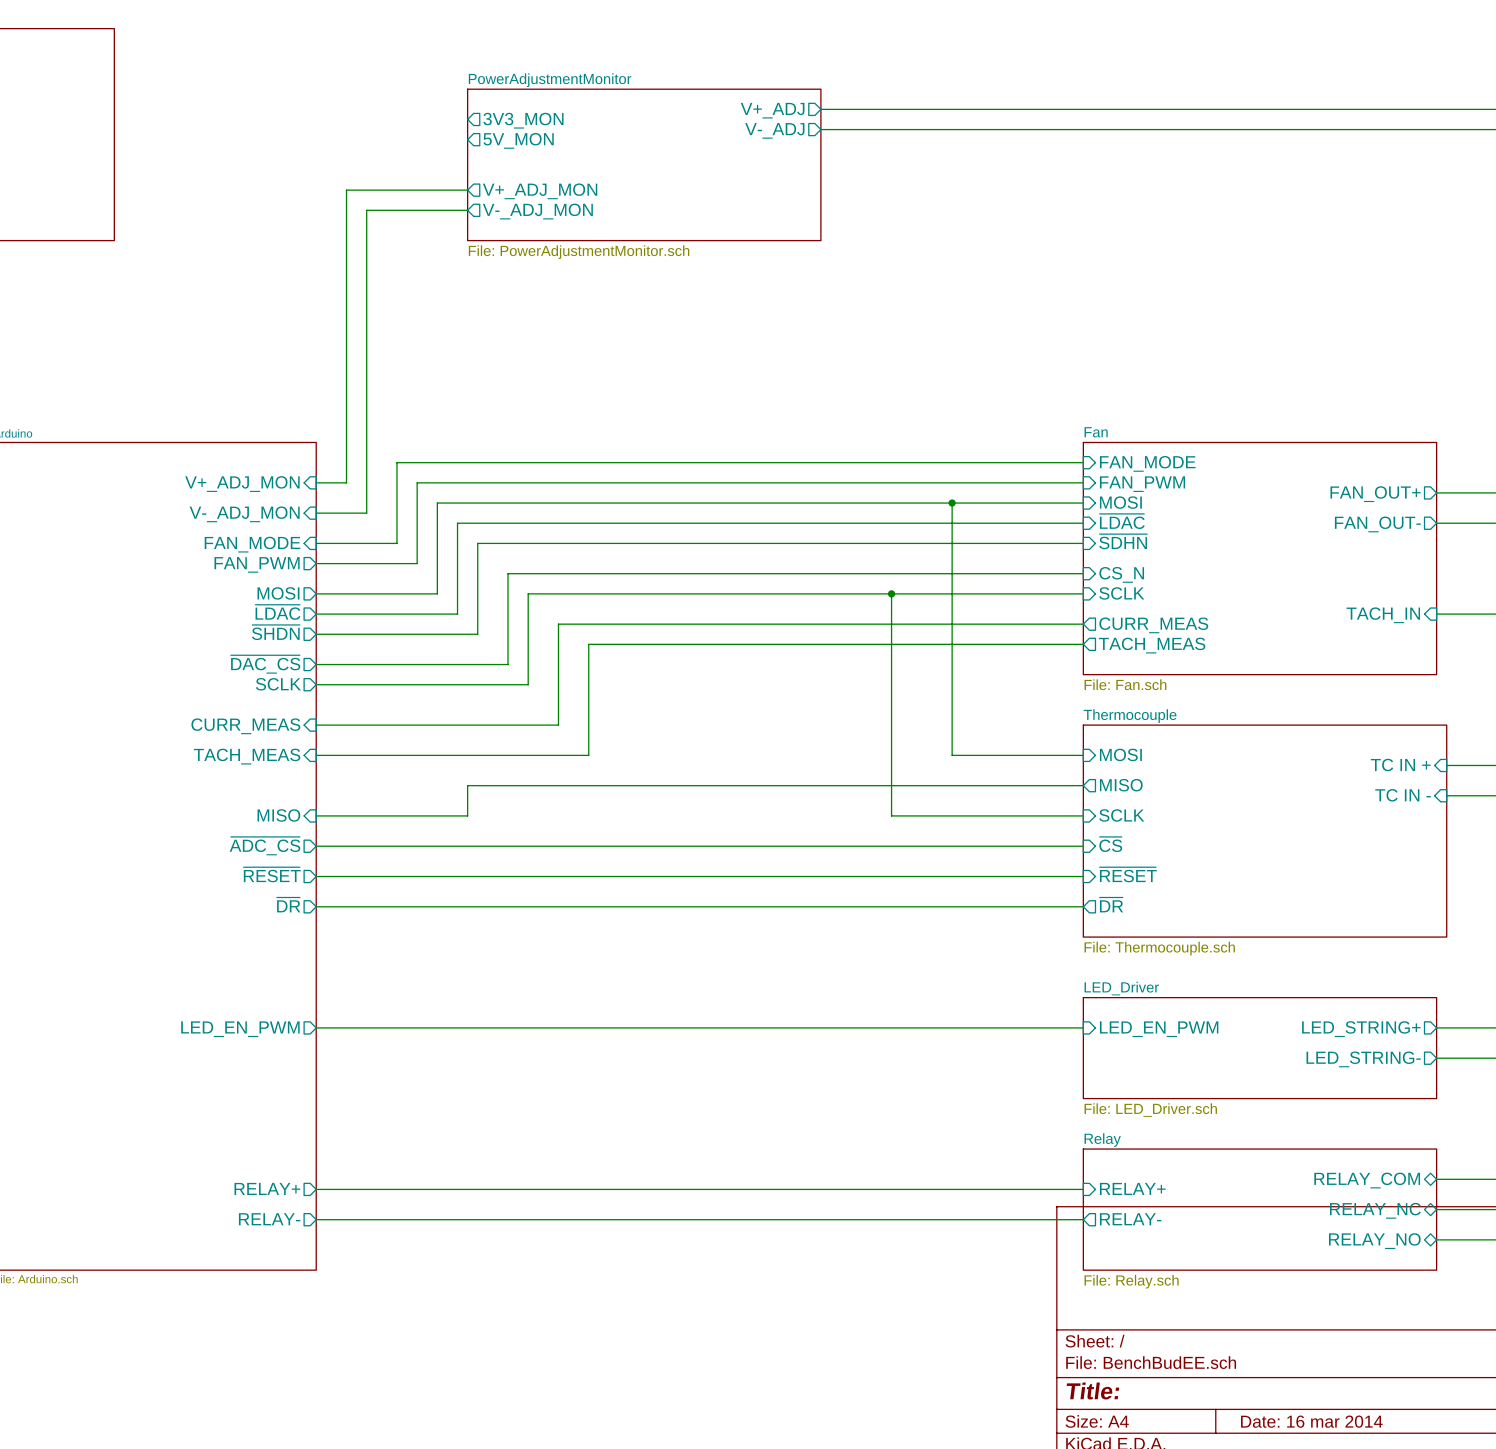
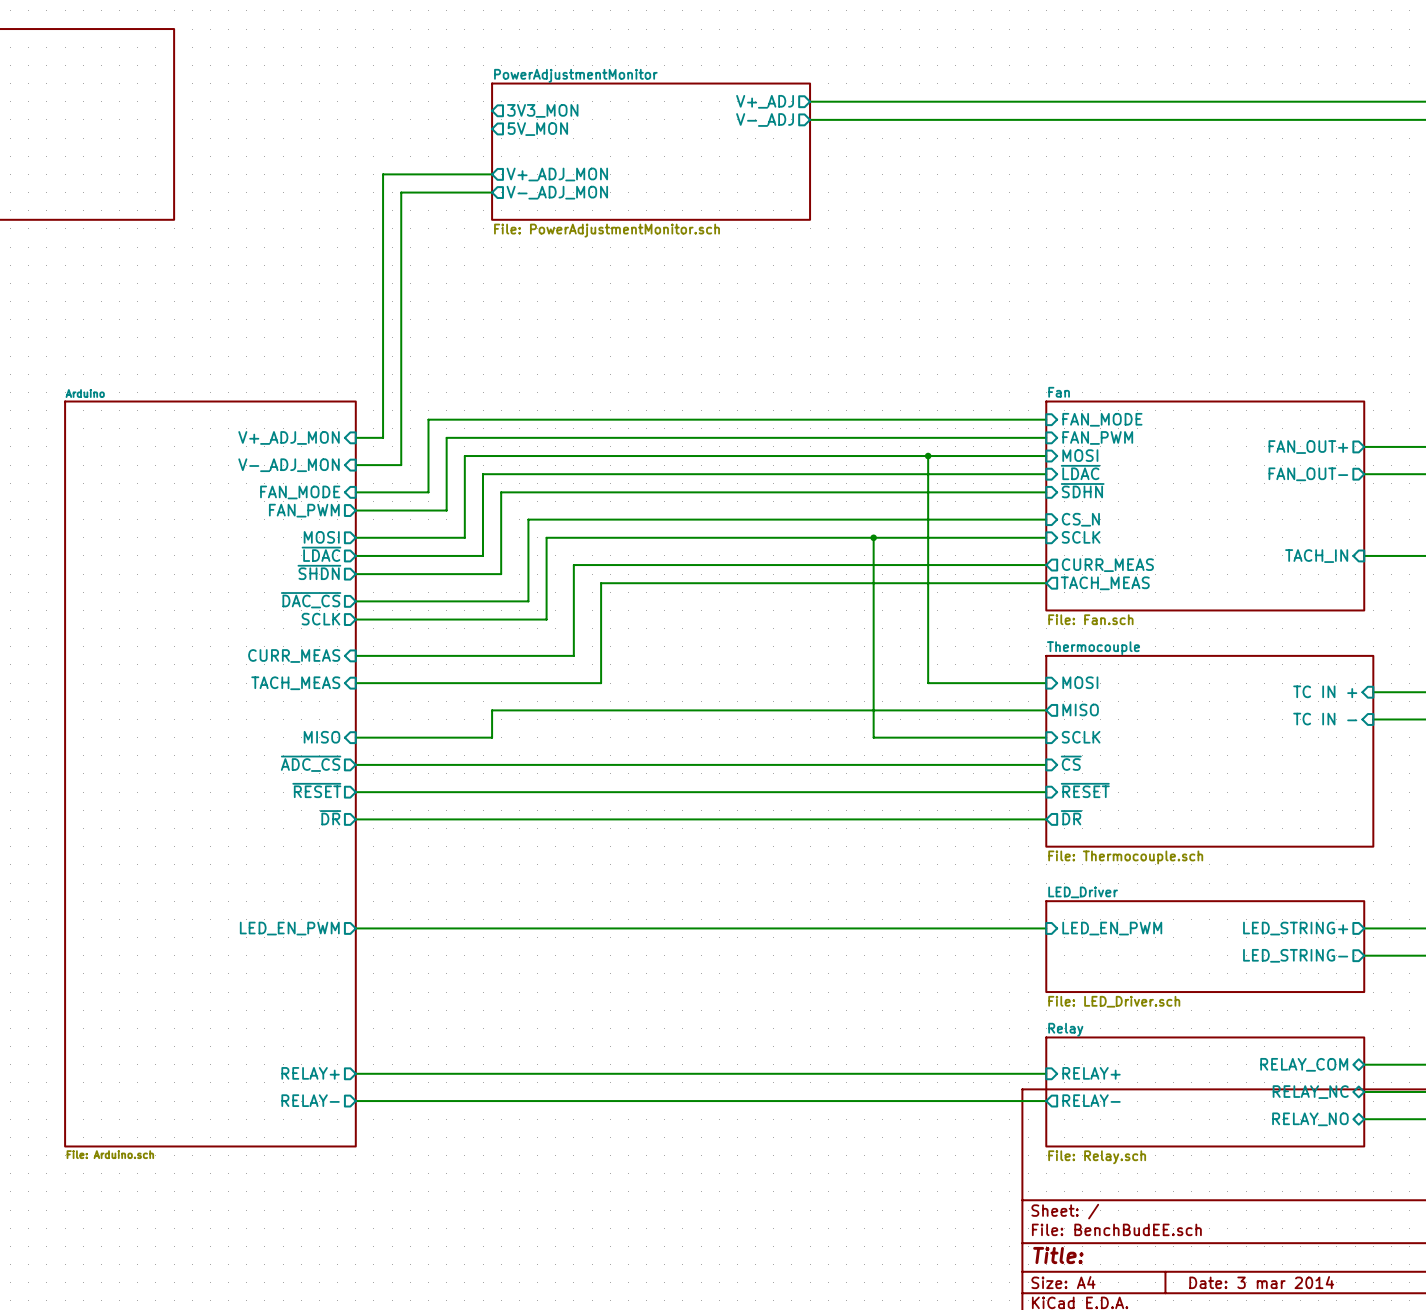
title block: Date: 16 mar 2014 (1311, 1421) -> Date: 3 mar 2014 (1261, 1282)

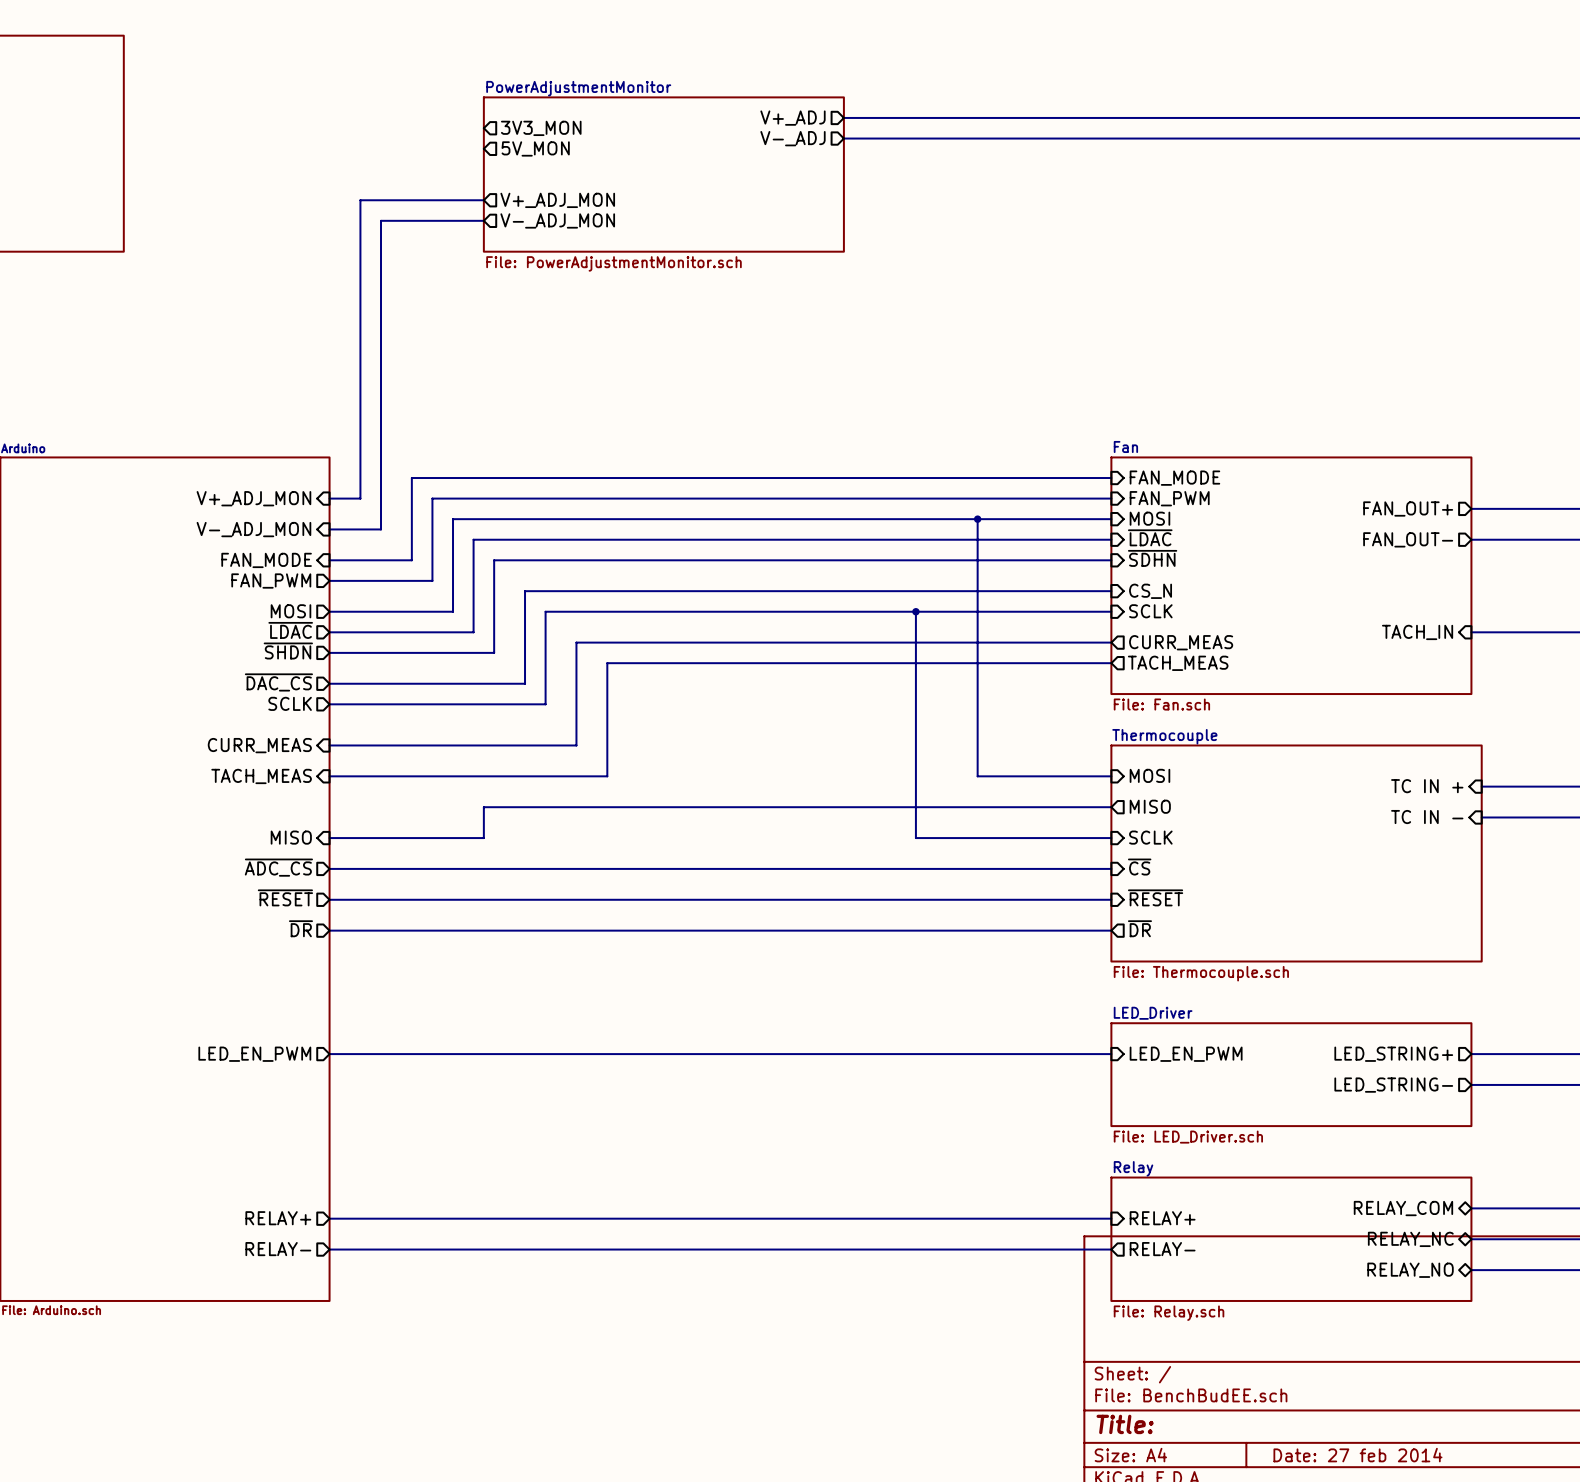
title block: Date: 3 mar 2014 (1261, 1282) -> Date: 27 feb 2014 (1357, 1455)

